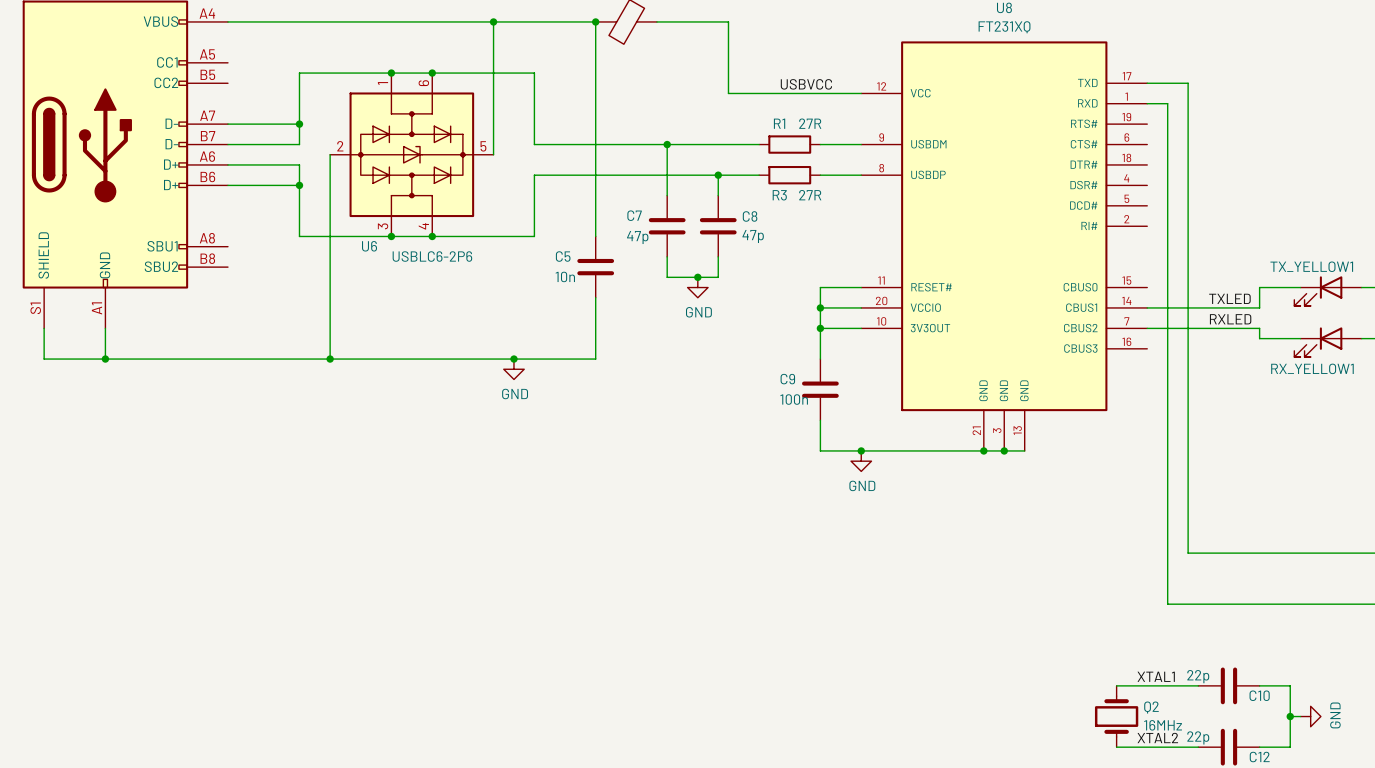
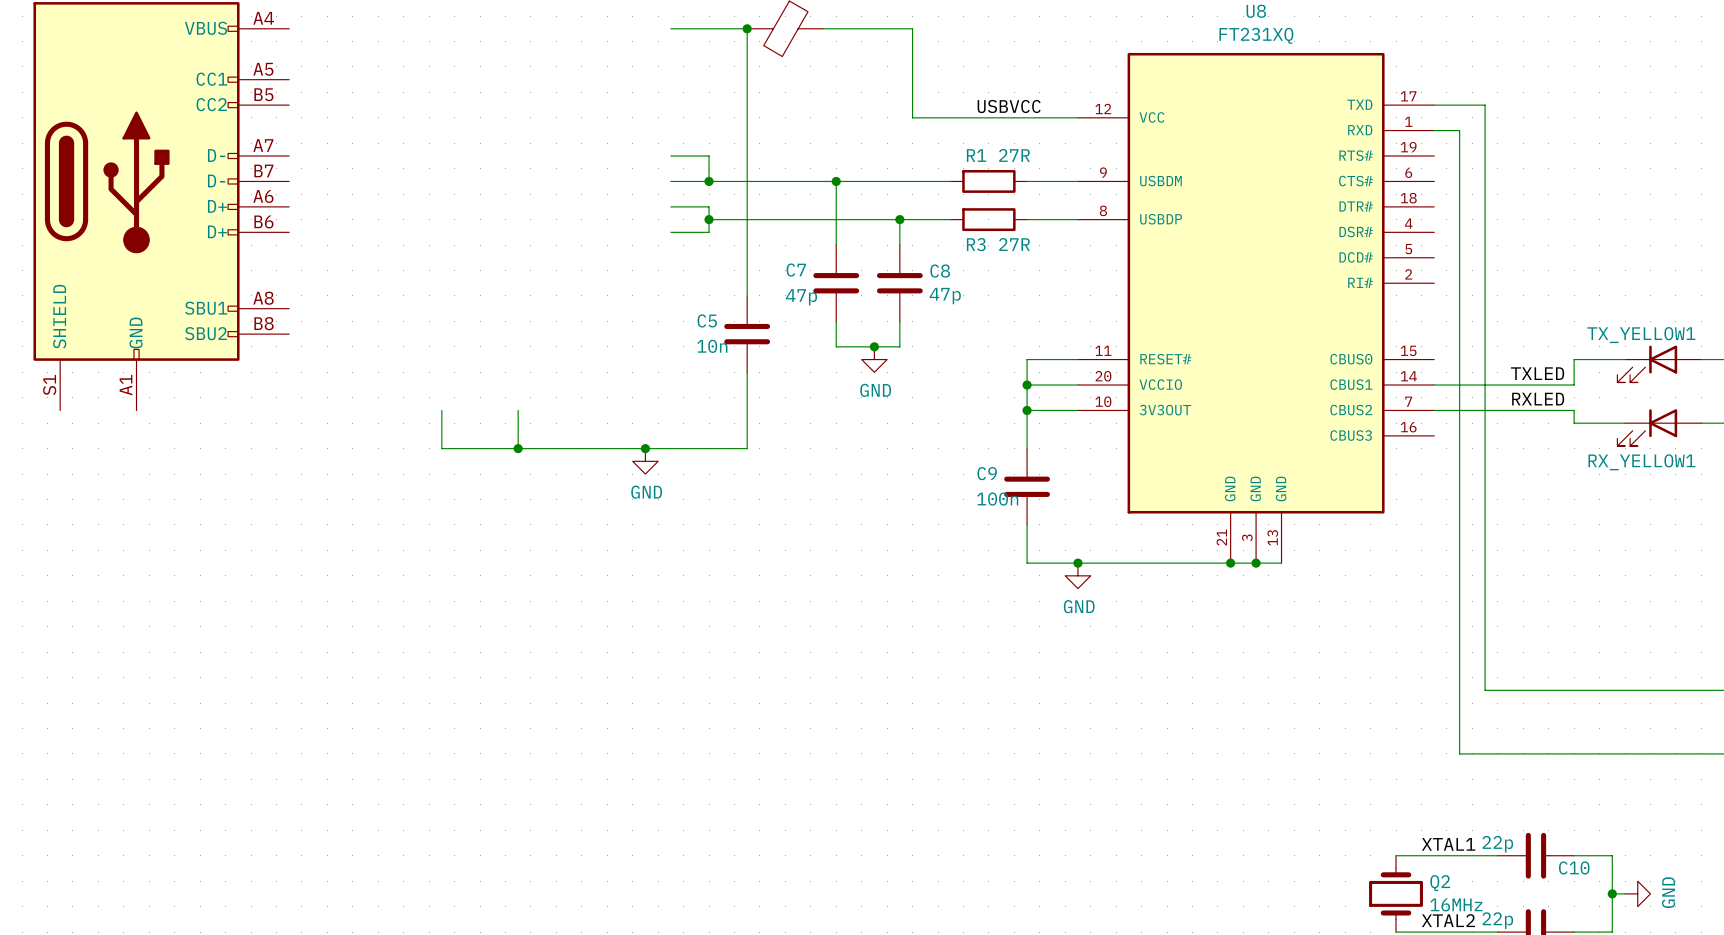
wire: (227, 21) (534, 21) -> none
wire: (493, 21) (493, 154) -> none
junction: (493, 21) -> none
junction: (391, 73) -> none
junction: (432, 73) -> none
wire: (227, 124) (299, 124) -> none
junction: (299, 124) -> none
wire: none -> (670, 156) (709, 156) (709, 181)
wire: (227, 144) (299, 144) (299, 73) (534, 73) (534, 144) -> none
junction: none -> (709, 181)
wire: (330, 154) (330, 359) -> none
U6: USBLC6-2P6 (411, 154) -> none
wire: (227, 164) (299, 164) (299, 236) (534, 236) (534, 175) (565, 175) -> none
wire: none -> (670, 206) (709, 206) (709, 232) (670, 232)
junction: none -> (709, 219)
wire: (227, 185) (299, 185) -> none
junction: (299, 185) -> none
junction: (391, 236) -> none
junction: (432, 236) -> none
wire: (44, 328) (44, 359) (350, 359) -> (441, 410) (441, 448)
wire: (105, 328) (105, 359) -> none
wire: none -> (518, 410) (518, 448)
junction: (105, 359) -> none
junction: (330, 359) -> none
junction: none -> (518, 448)

